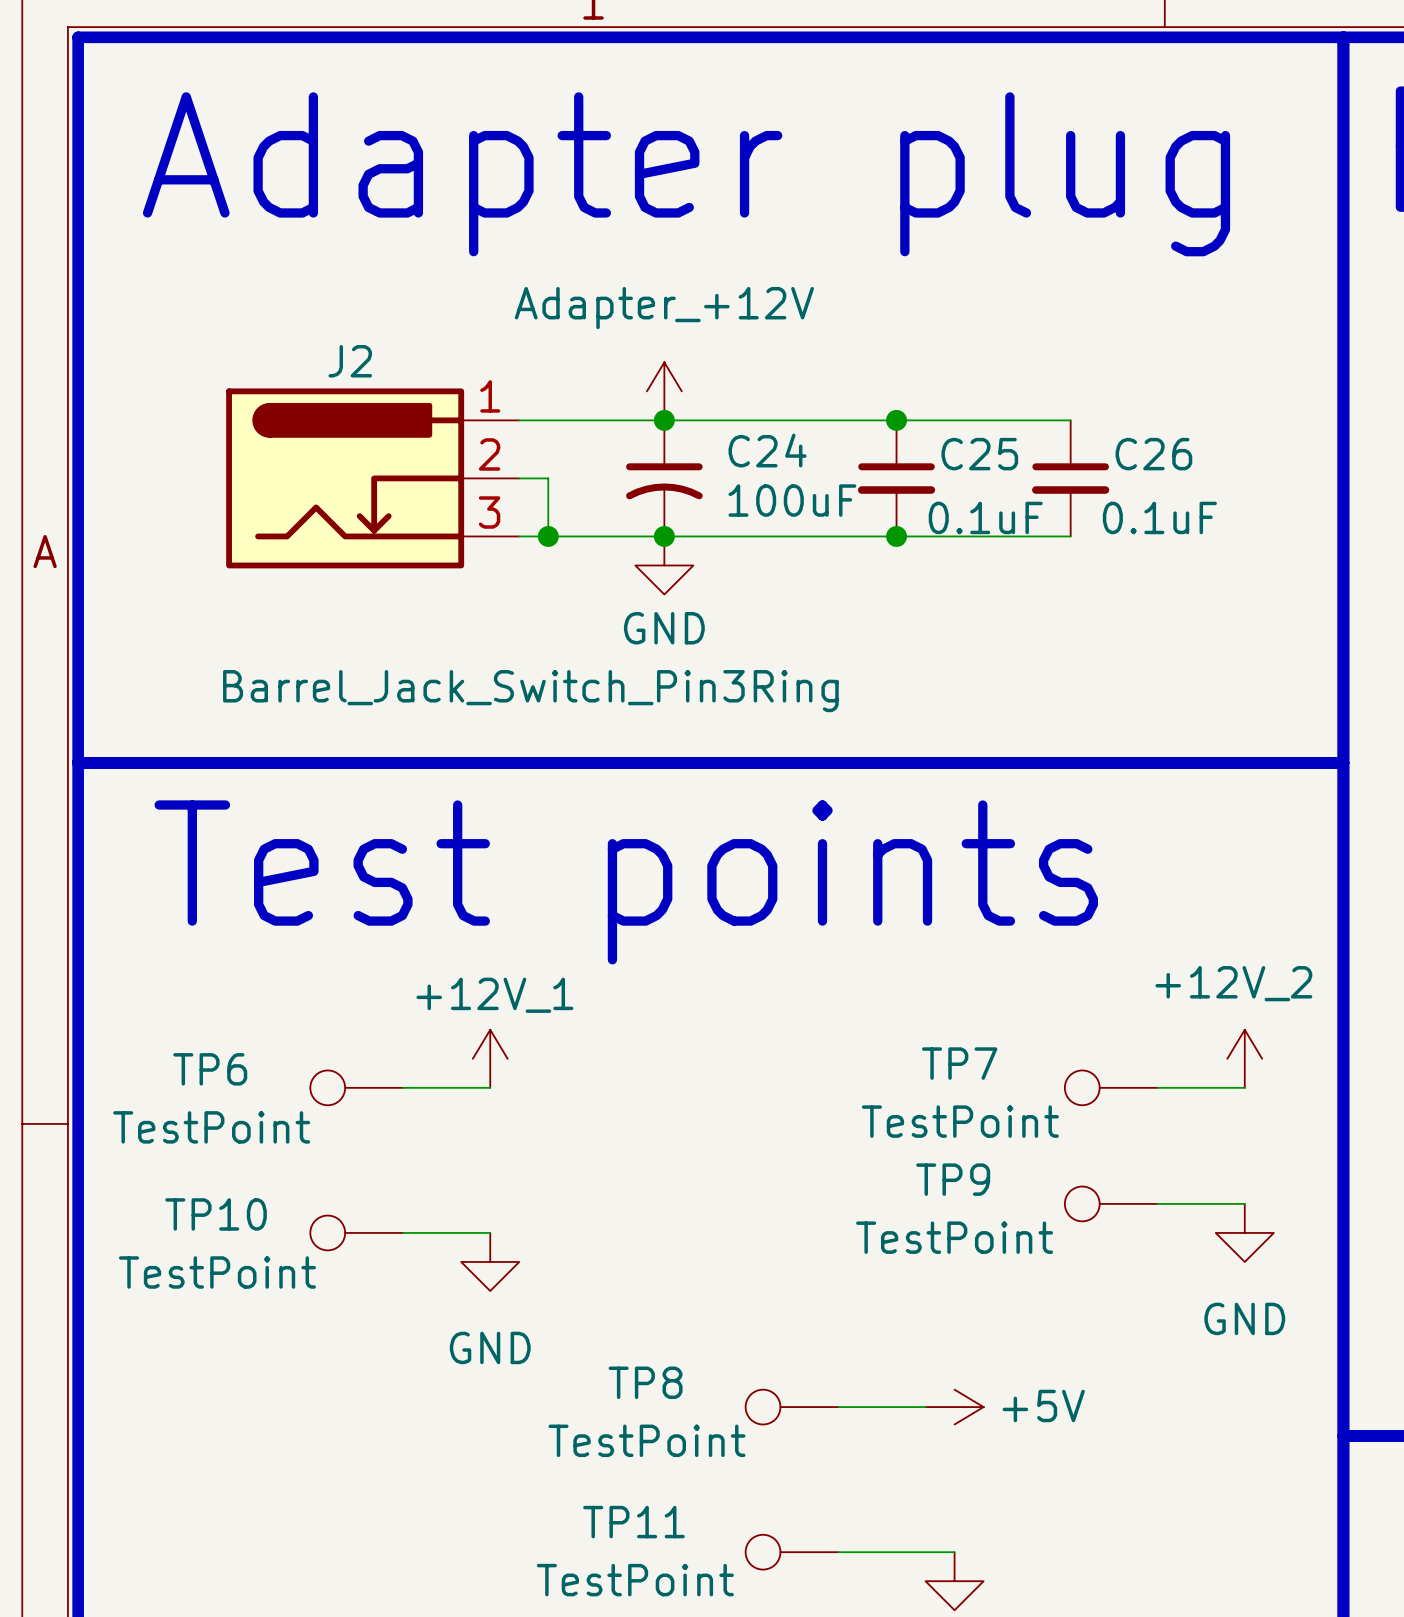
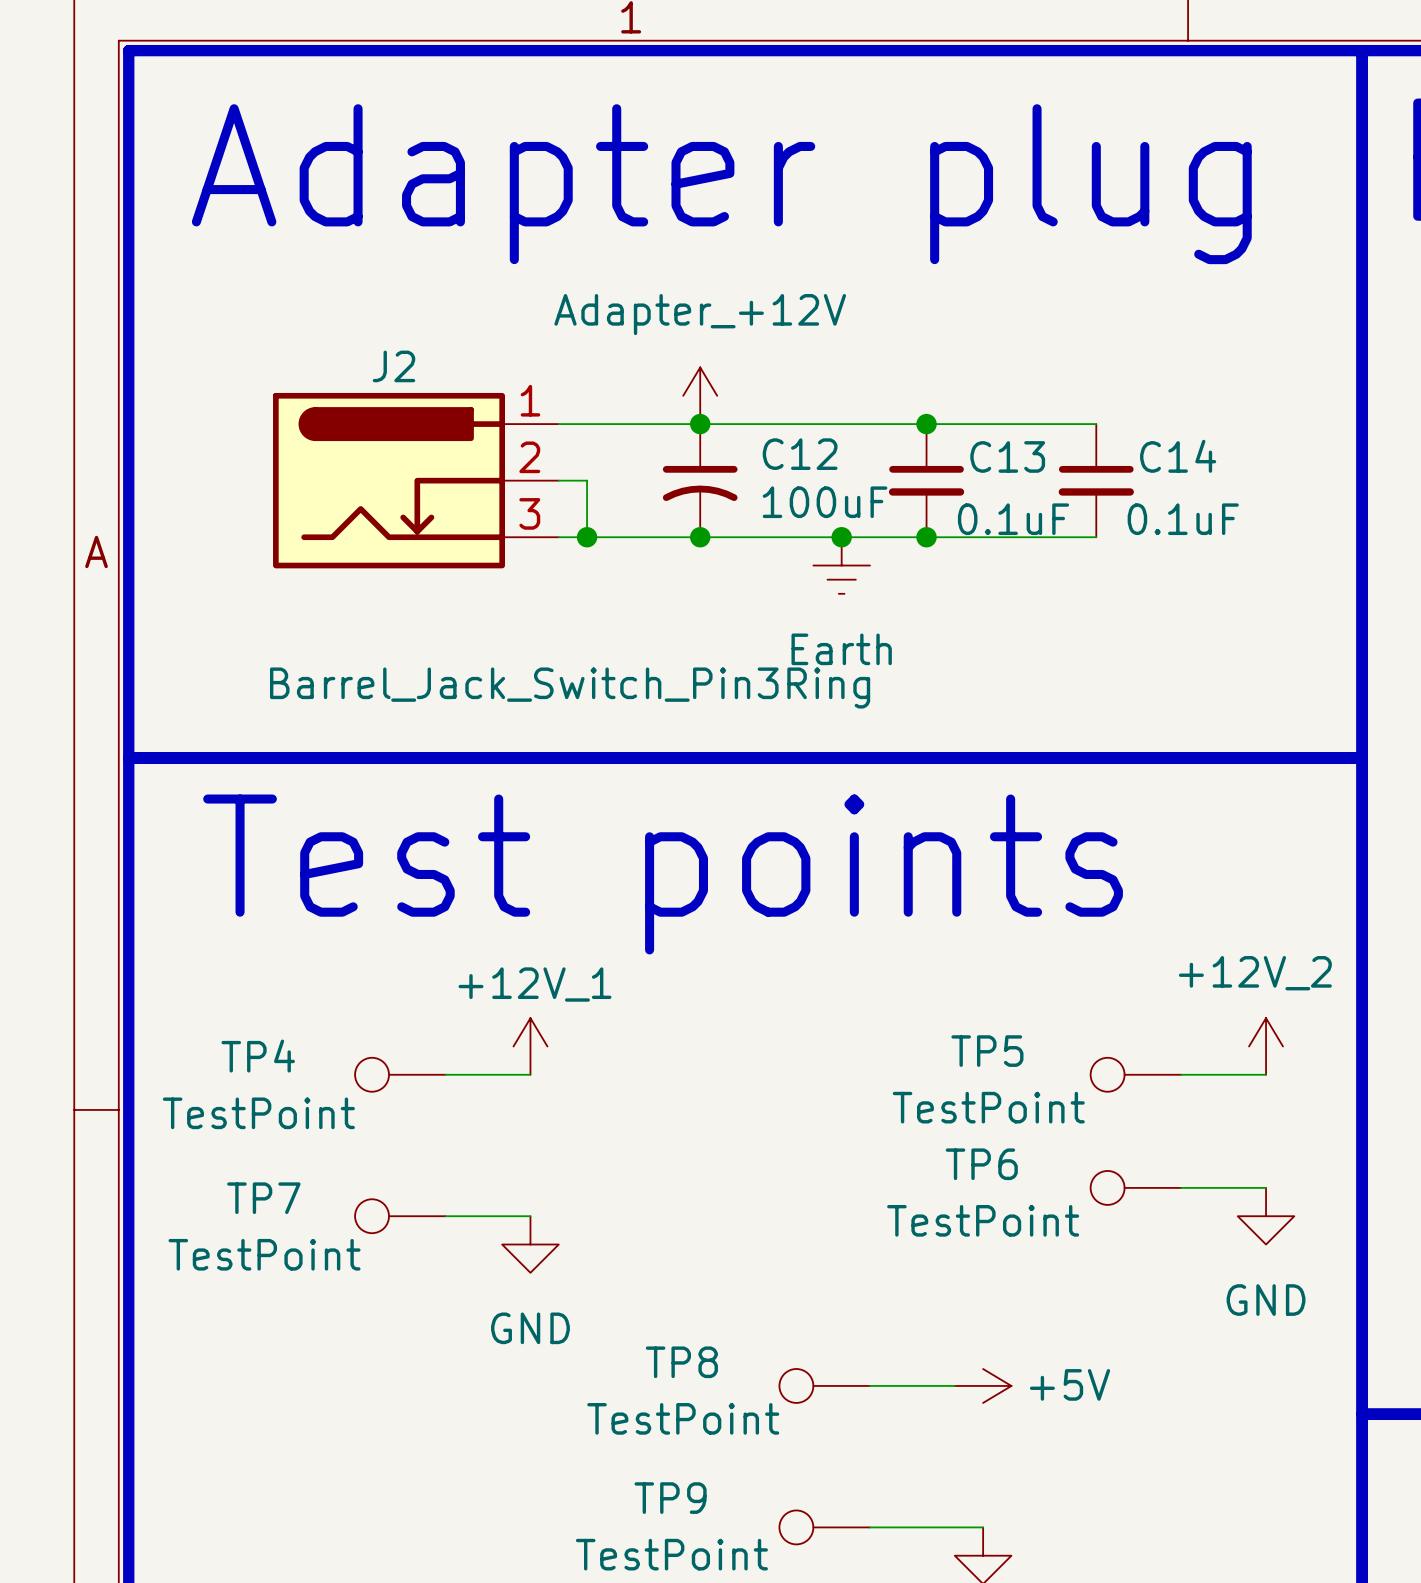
C24 name: C24 (767, 450) -> C12 (800, 454)
C25 name: C25 (979, 454) -> C13 (1007, 456)
C26 name: C26 (1153, 454) -> C14 (1178, 456)
junction: none -> (841, 537)
power symbol: GND (664, 565) -> none
power symbol: none -> Earth (841, 565)
TP7 name: TP7 (959, 1063) -> TP5 (987, 1051)
TP6 name: TP6 (210, 1069) -> TP4 (258, 1056)
TP9 name: TP9 (953, 1179) -> TP6 (981, 1164)
TP10 name: TP10 (216, 1214) -> TP7 (263, 1198)
TP11 name: TP11 (633, 1522) -> TP9 (670, 1498)

